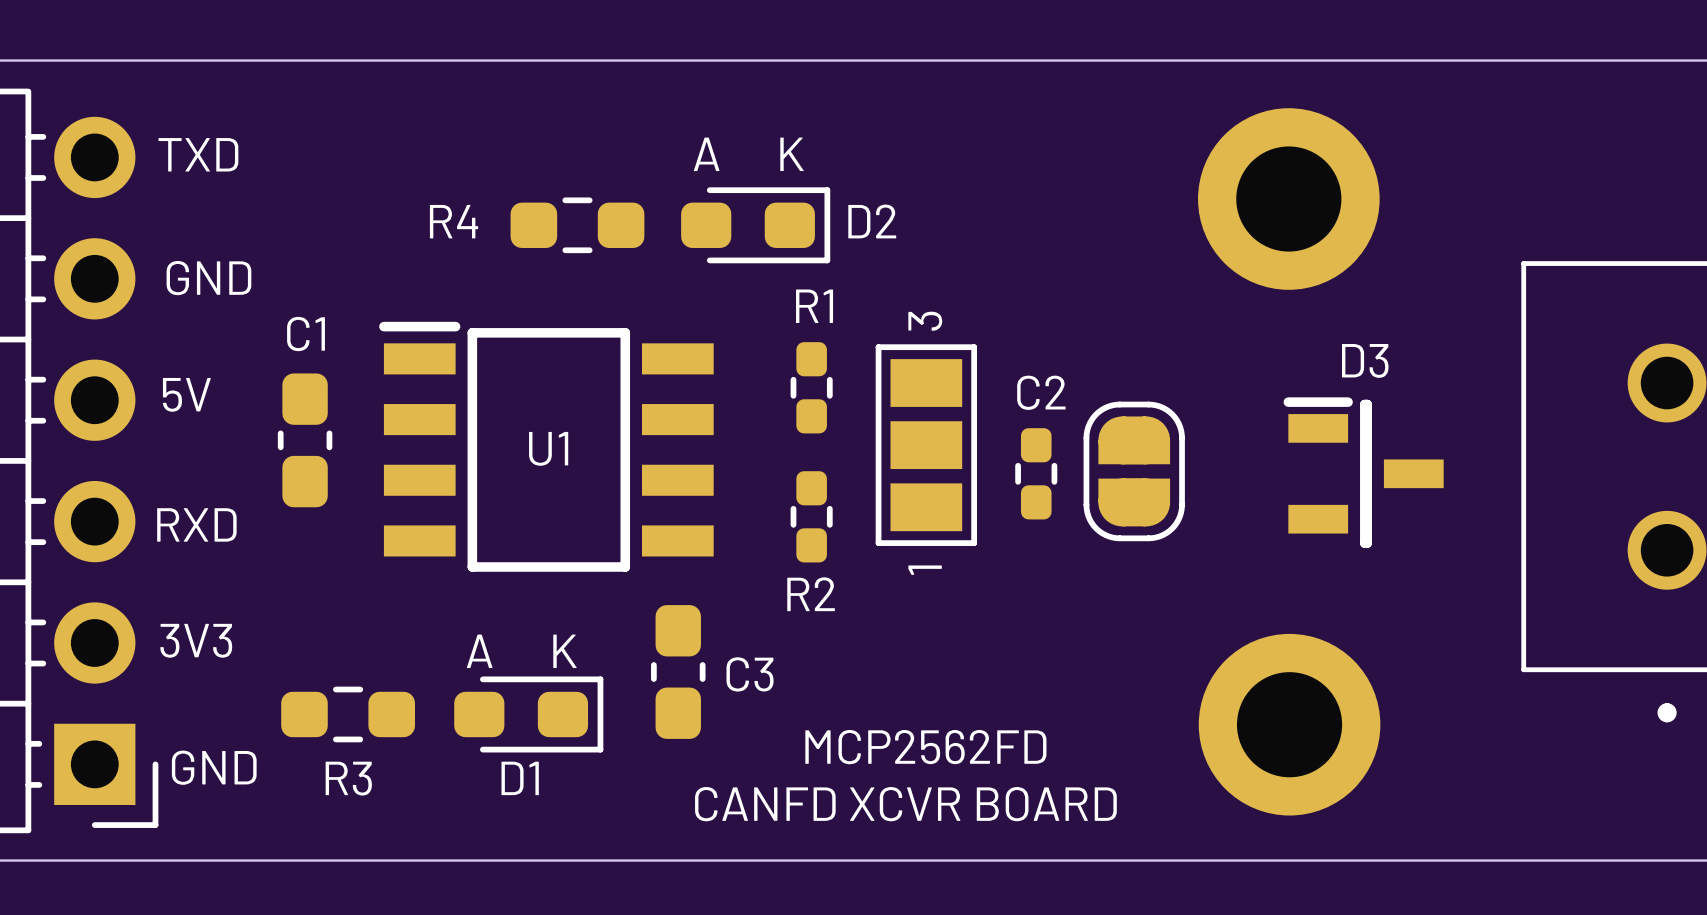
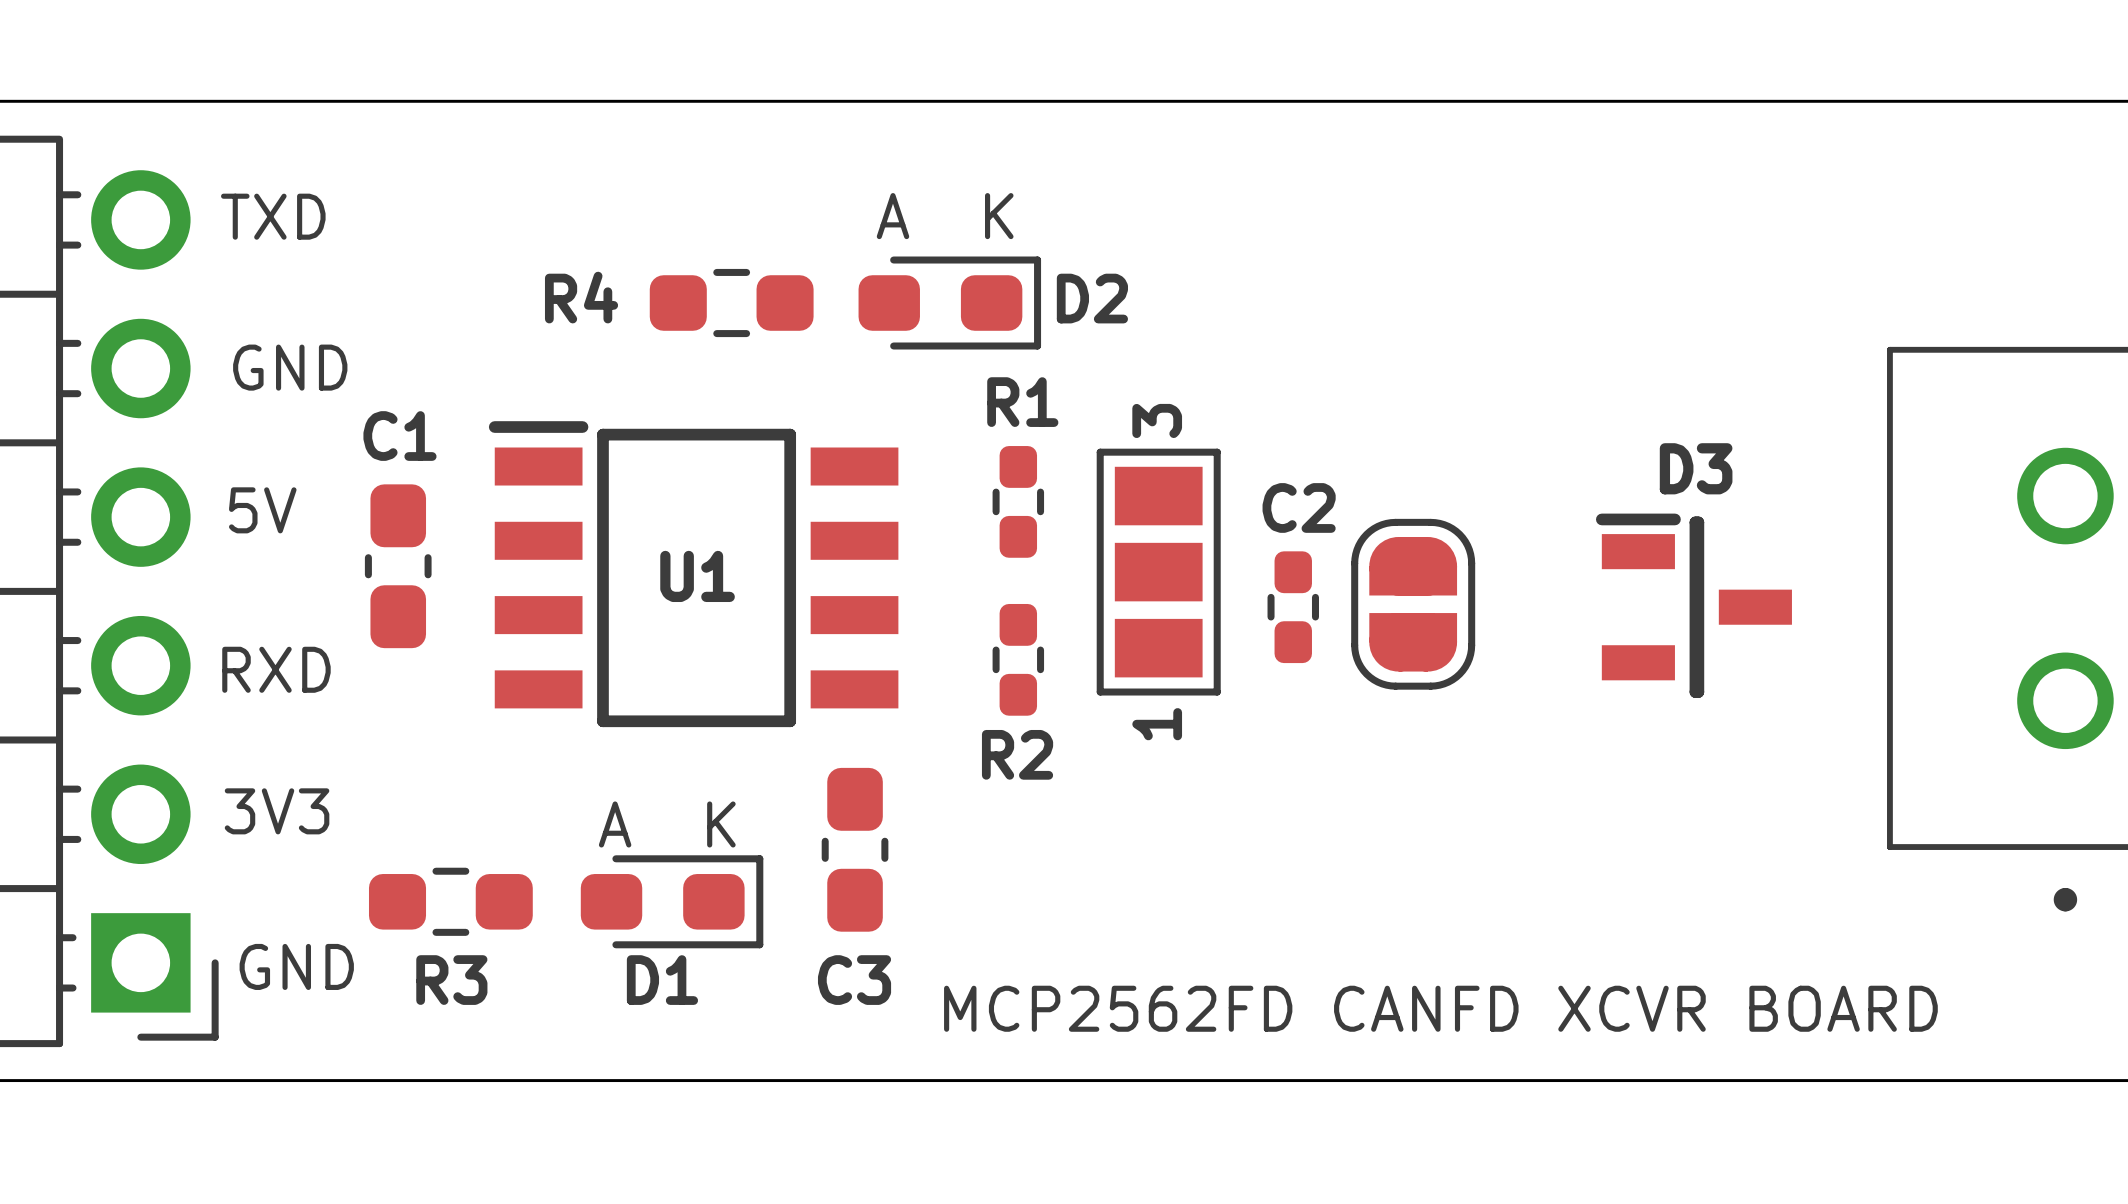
part: (1288, 199) -> none
C3 name position: C3 (750, 674) -> C3 (854, 980)
part: (1289, 724) -> none
text: MCP2562FD (925, 747) -> none
text: CANFD XCVR BOARD (905, 804) -> MCP2562FD CANFD XCVR BOARD (1440, 1008)

